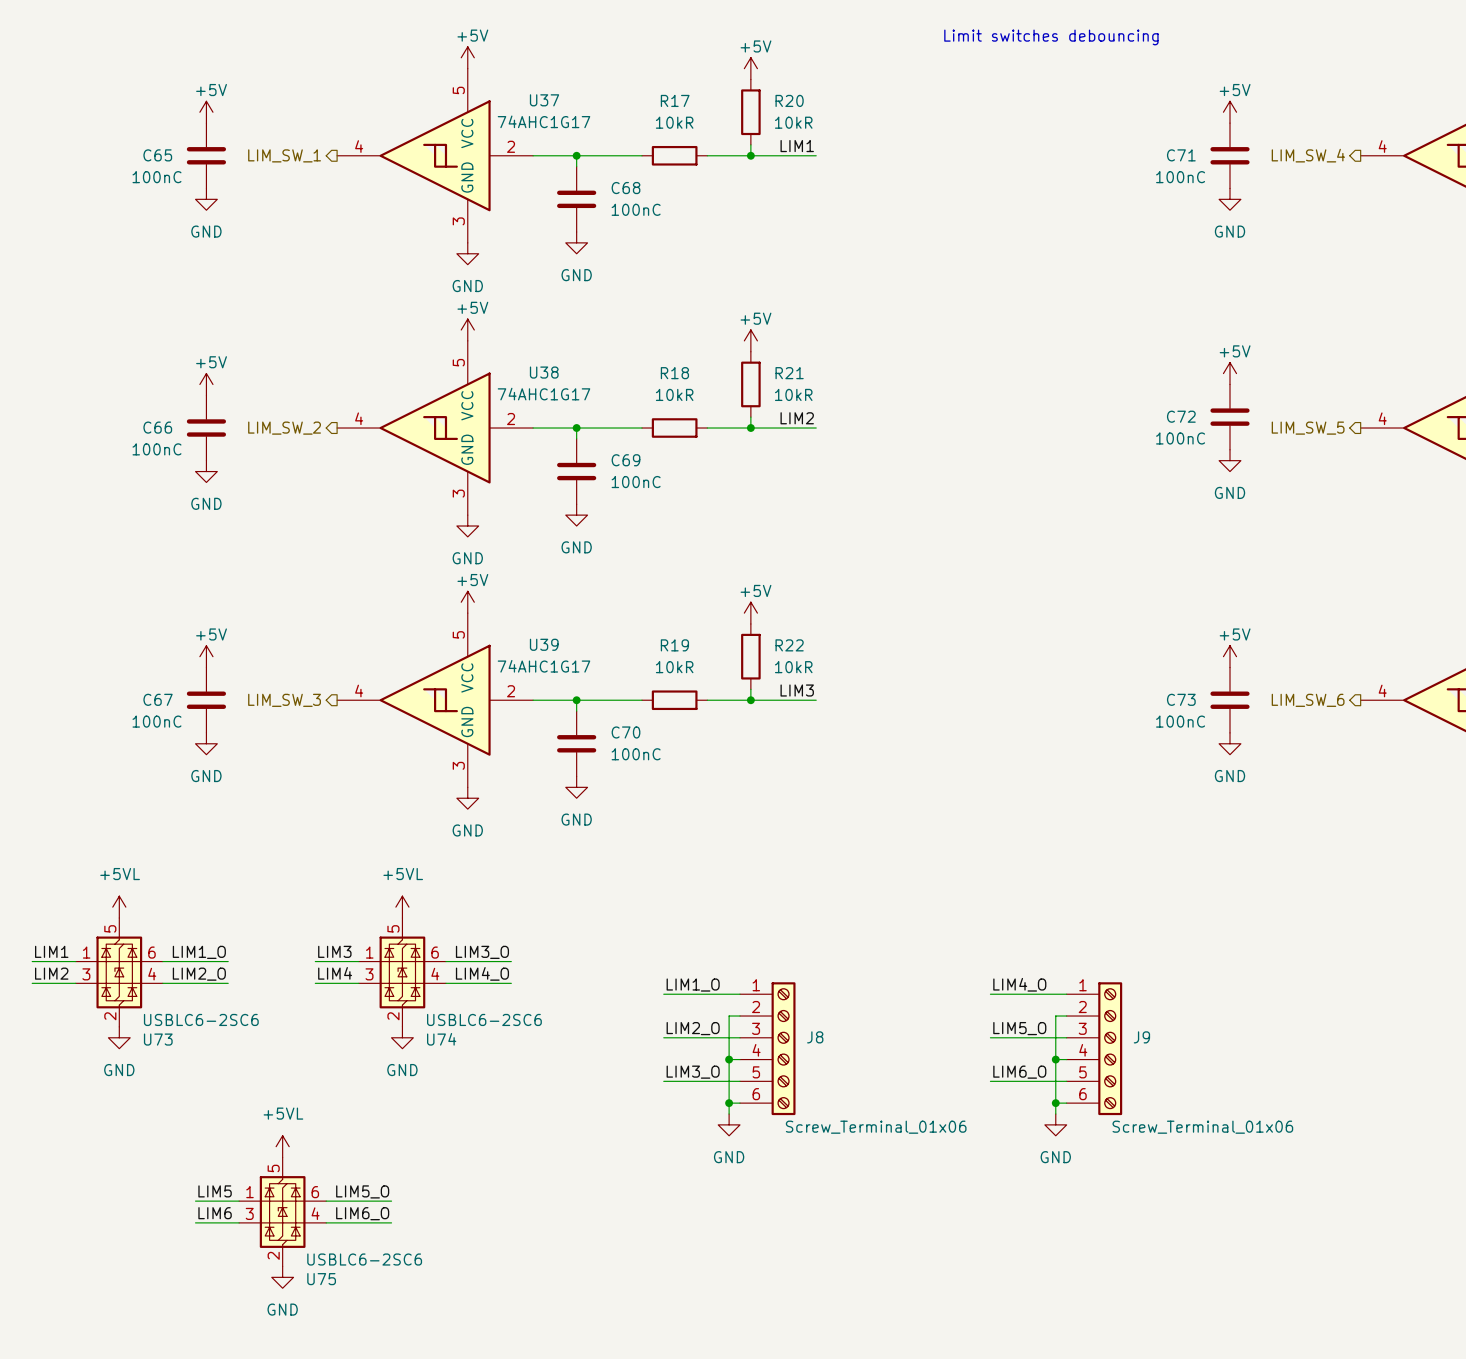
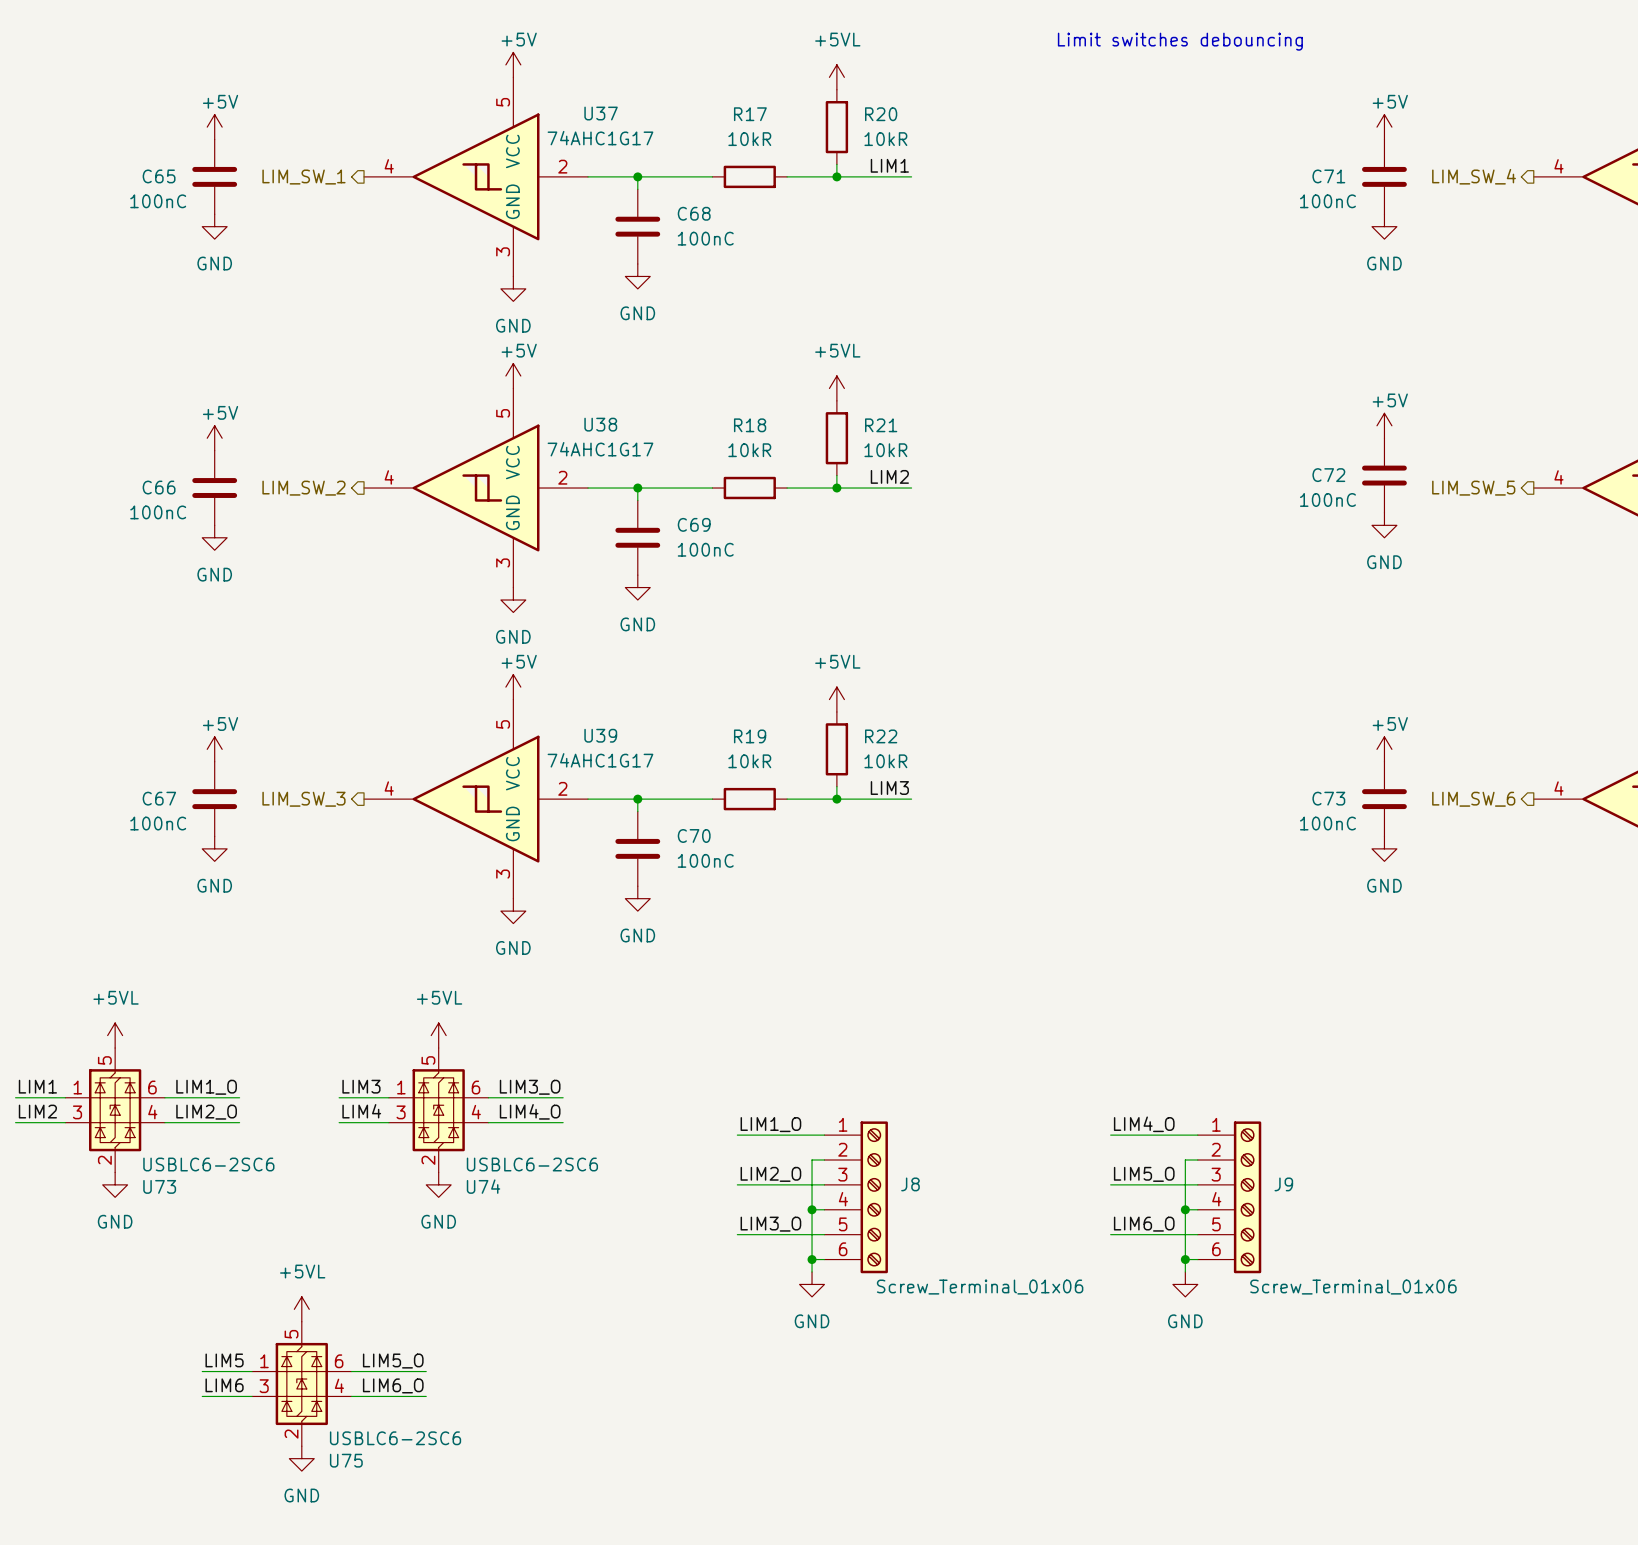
power symbol: +5V (750, 68) -> +5VL (836, 77)
power symbol: +5V (750, 340) -> +5VL (836, 388)
power symbol: +5V (750, 613) -> +5VL (836, 699)

